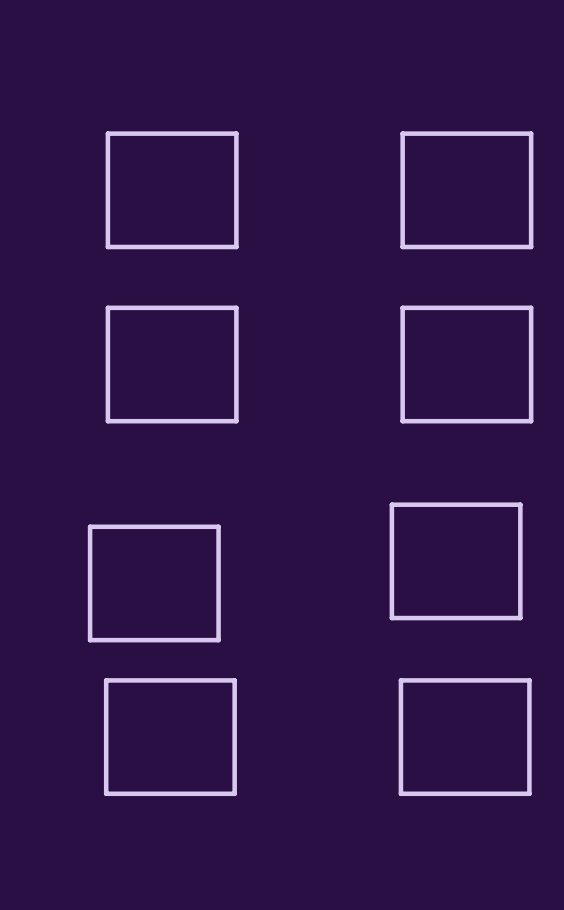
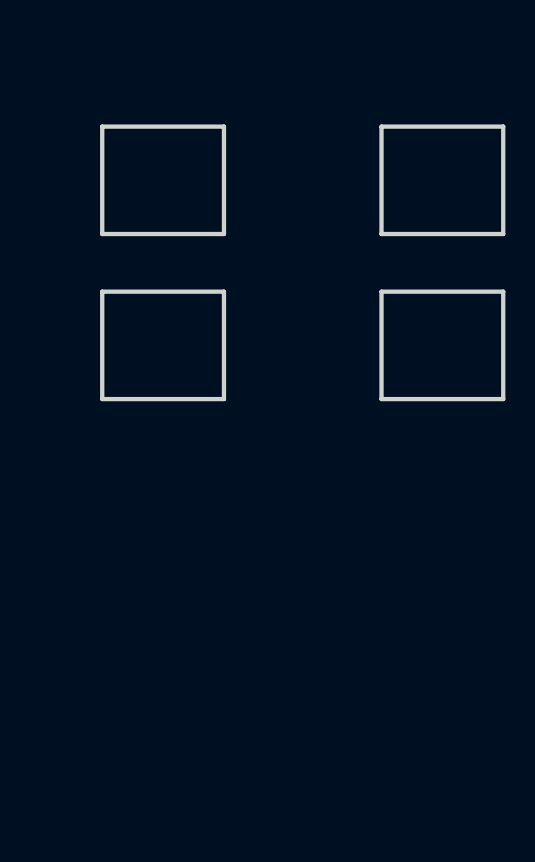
part: (456, 561) -> none
part: (154, 583) -> none
part: (170, 737) -> none
part: (465, 737) -> none

